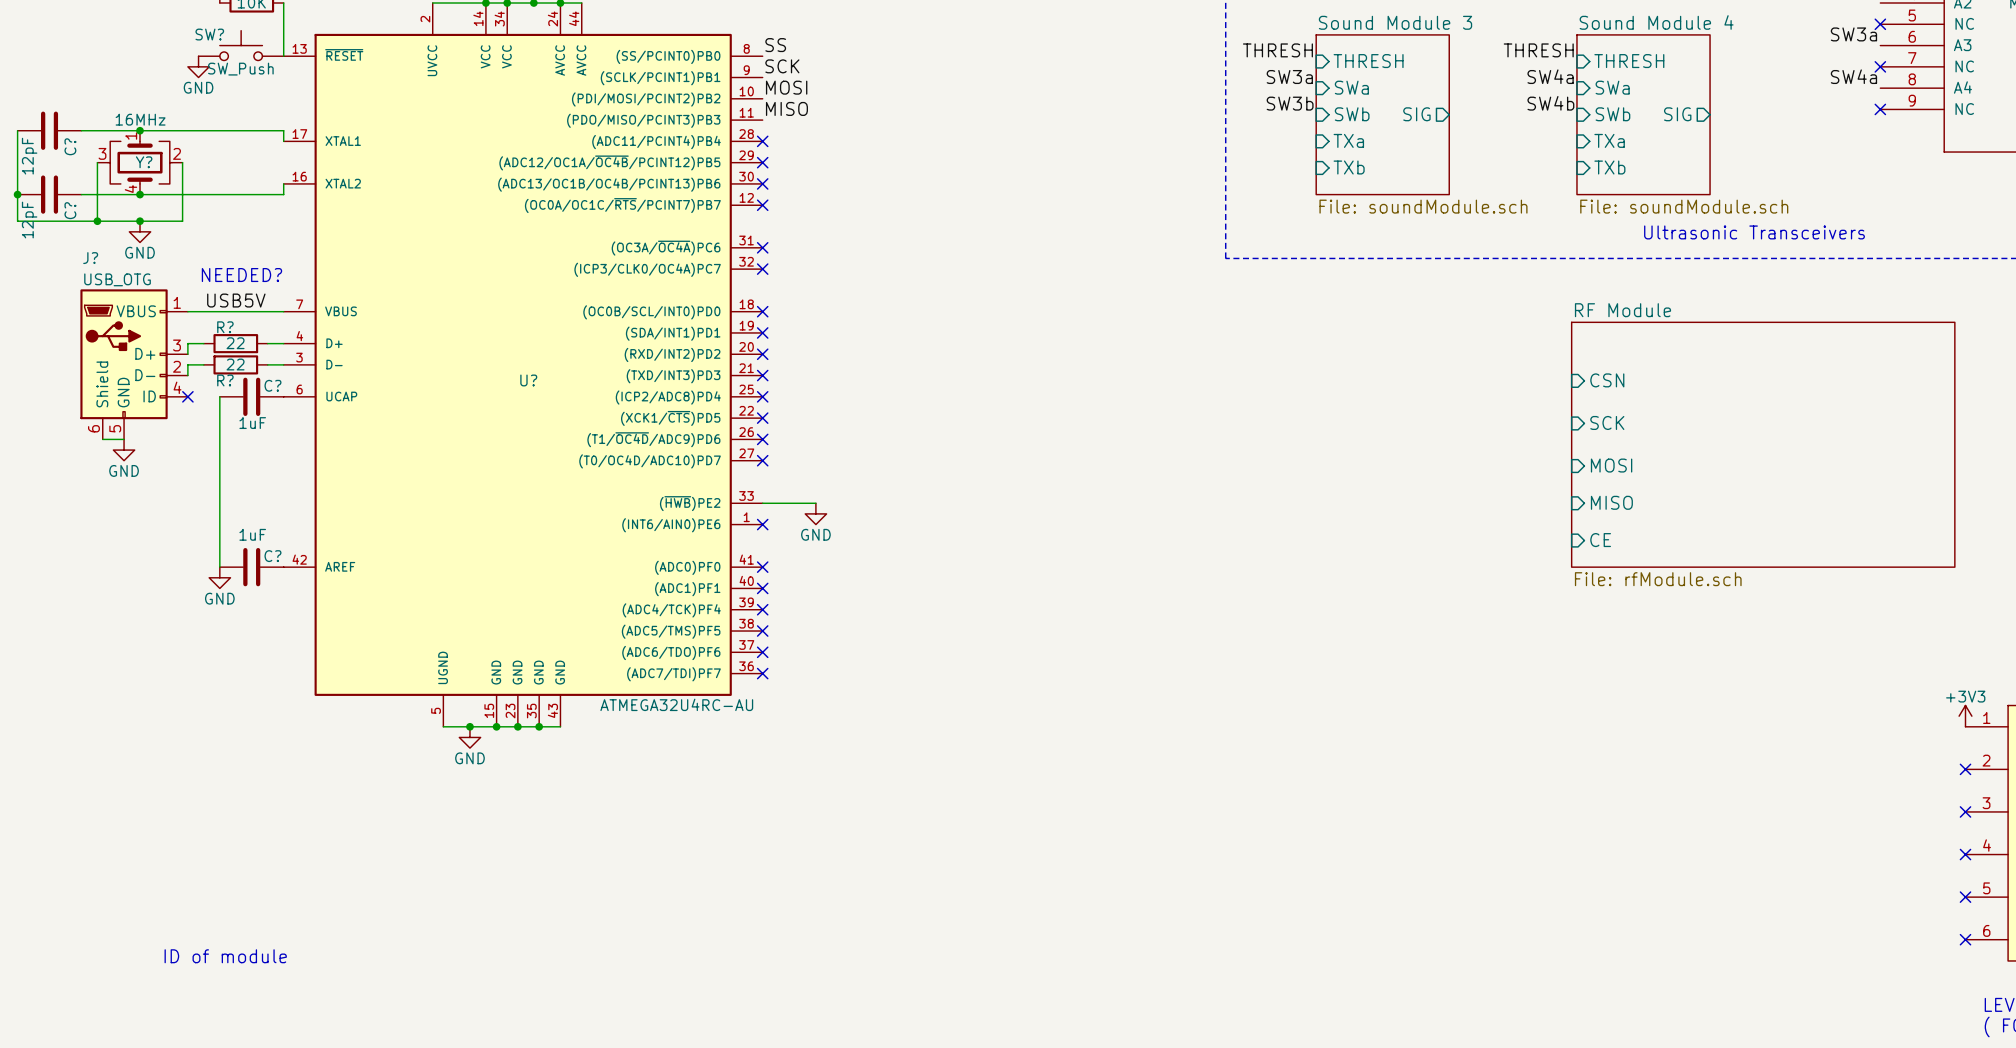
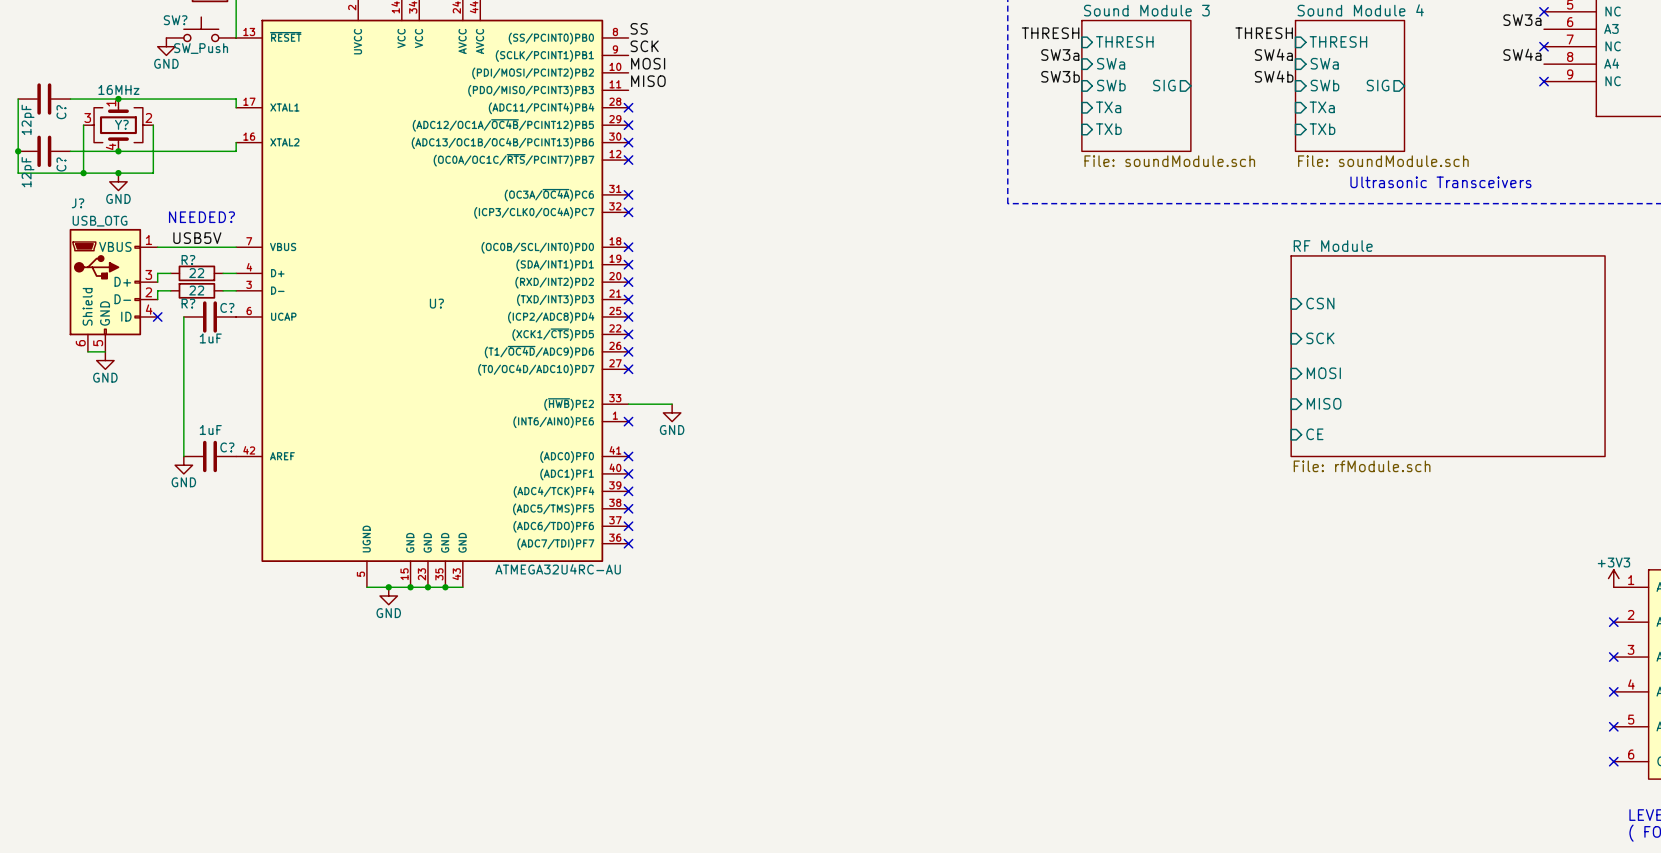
text: ID of module (225, 956) -> none

